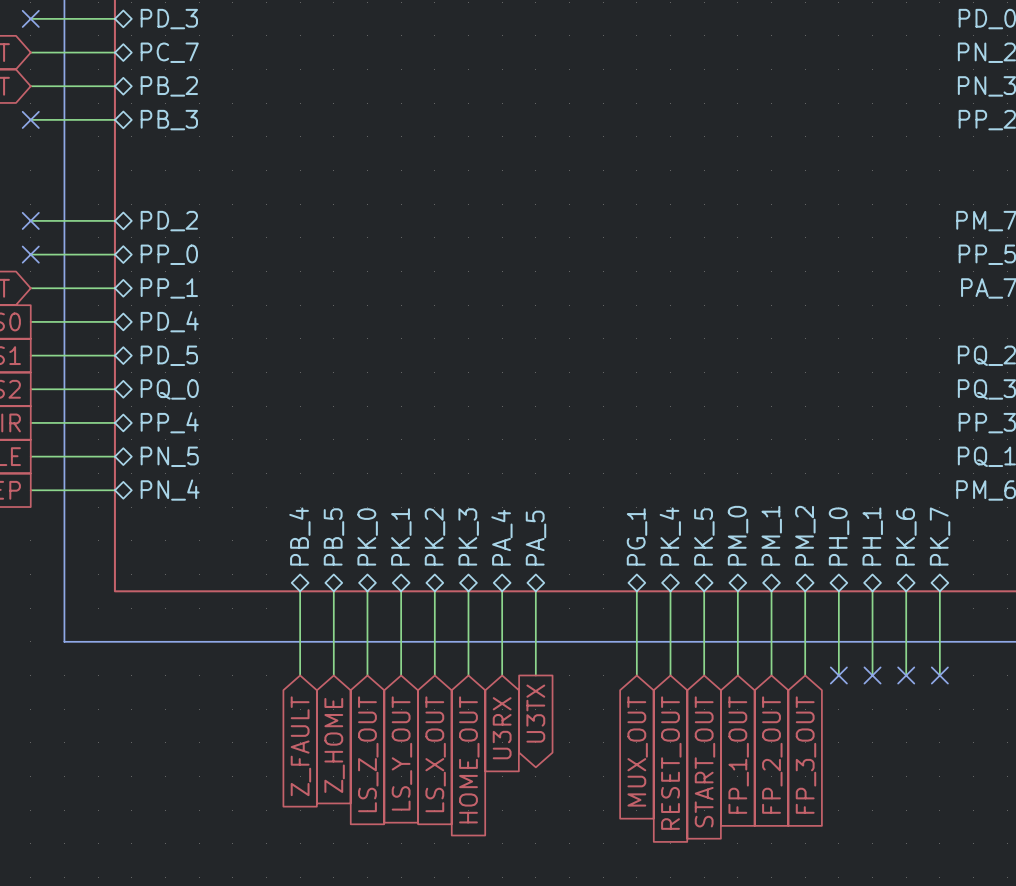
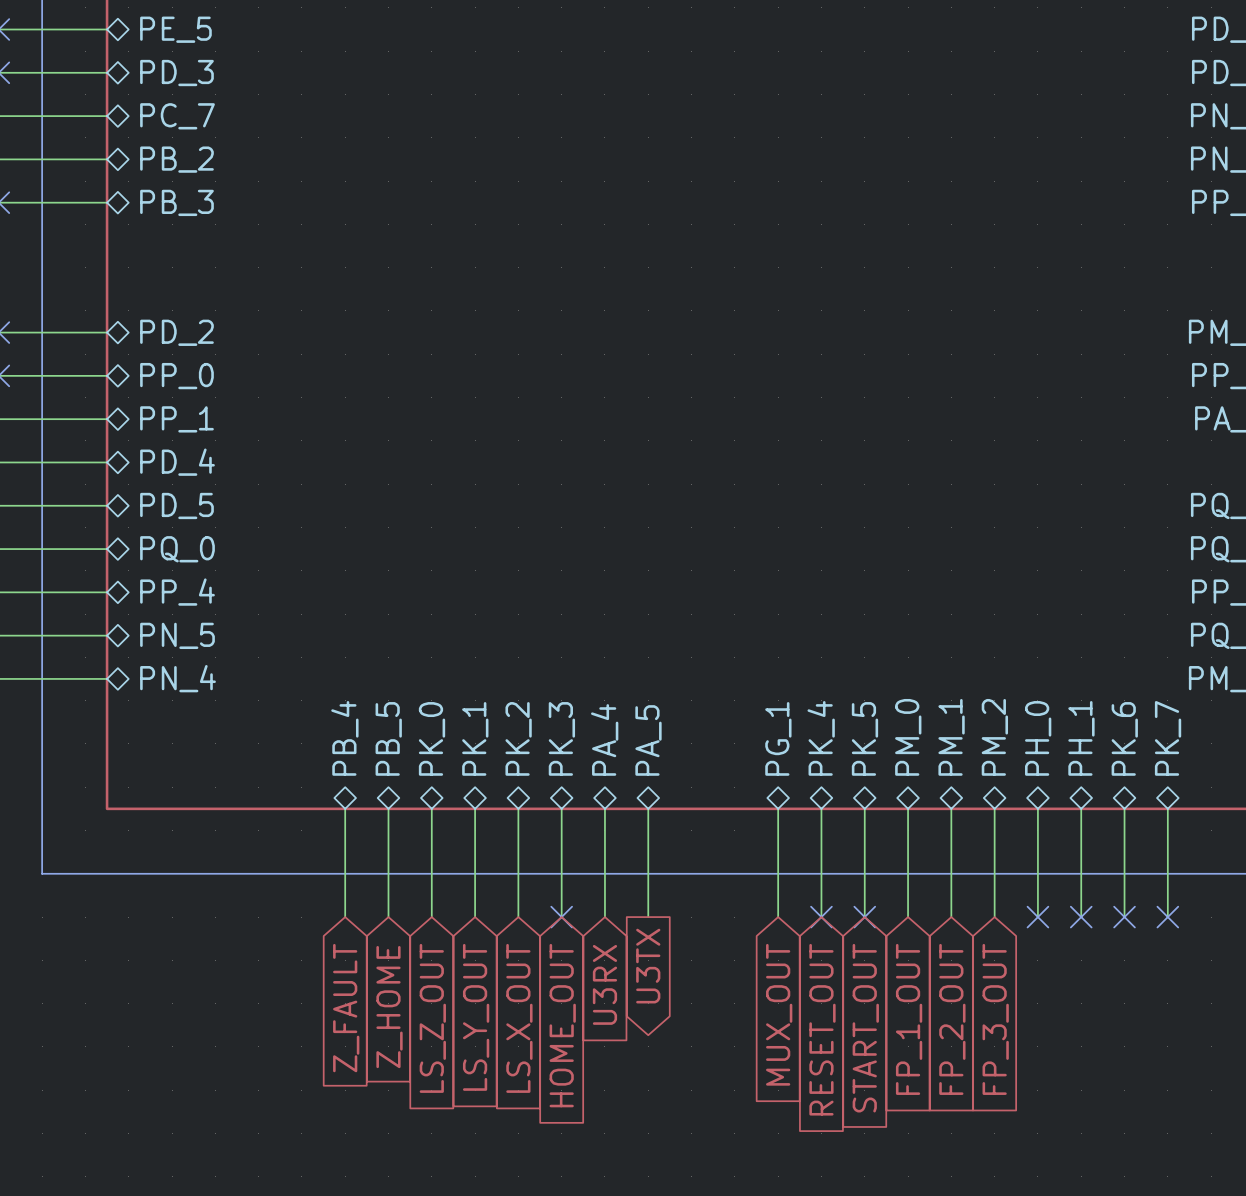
no-connect mark: none -> (561, 917)
no-connect mark: none -> (821, 917)
no-connect mark: none -> (864, 917)

